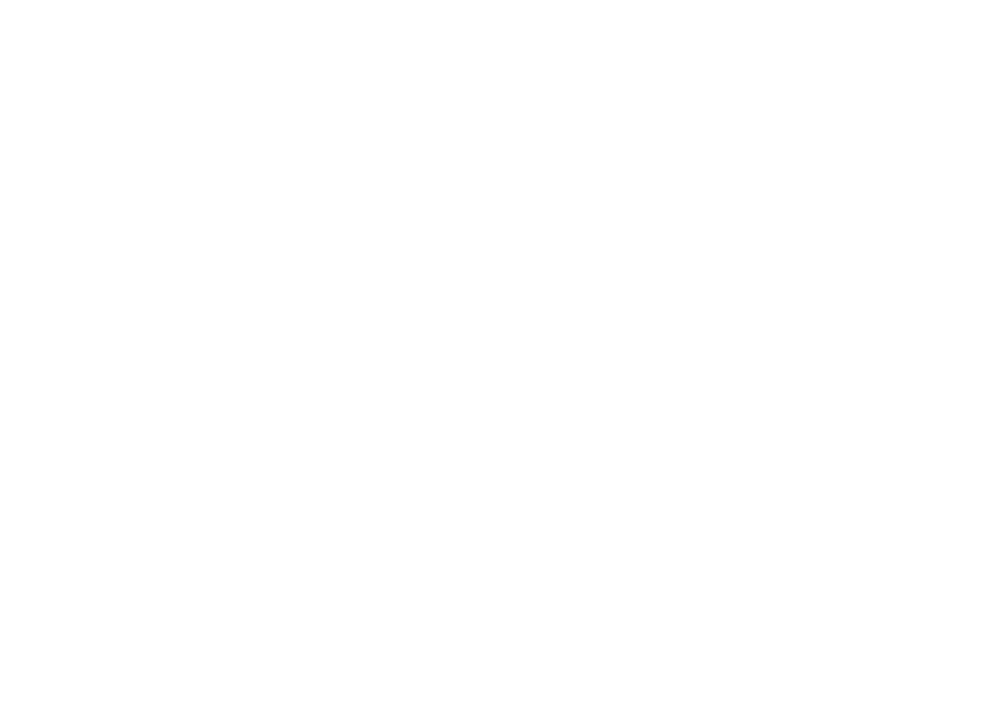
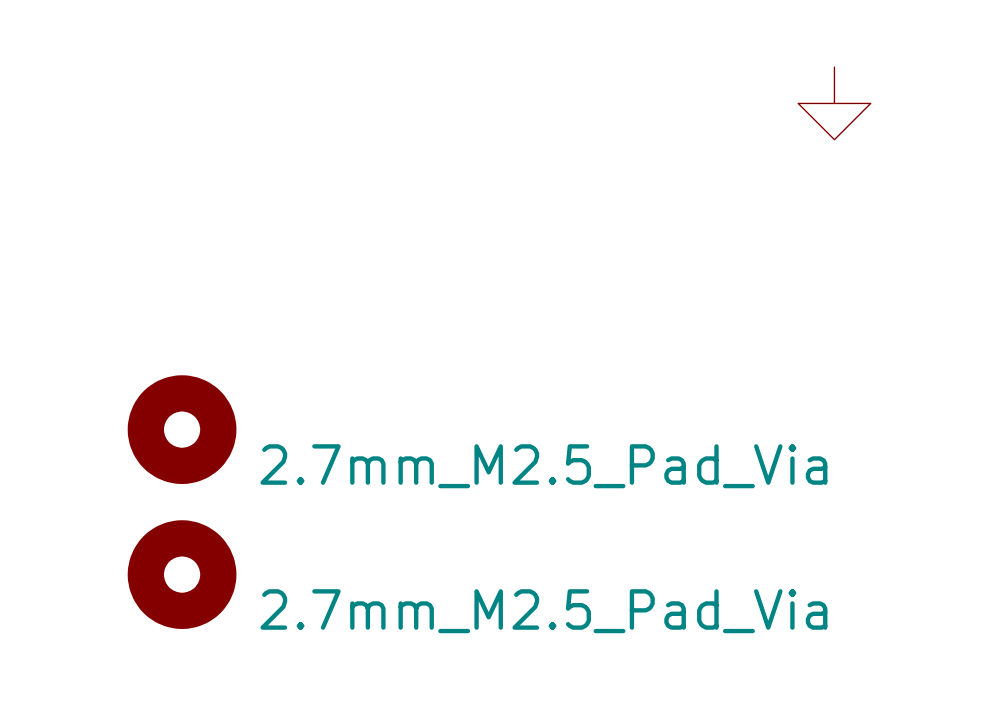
power symbol: none -> (834, 103)
part: none -> 2.7mm_M2.5_Pad_Via (182, 429)
part: none -> 2.7mm_M2.5_Pad_Via (182, 574)

